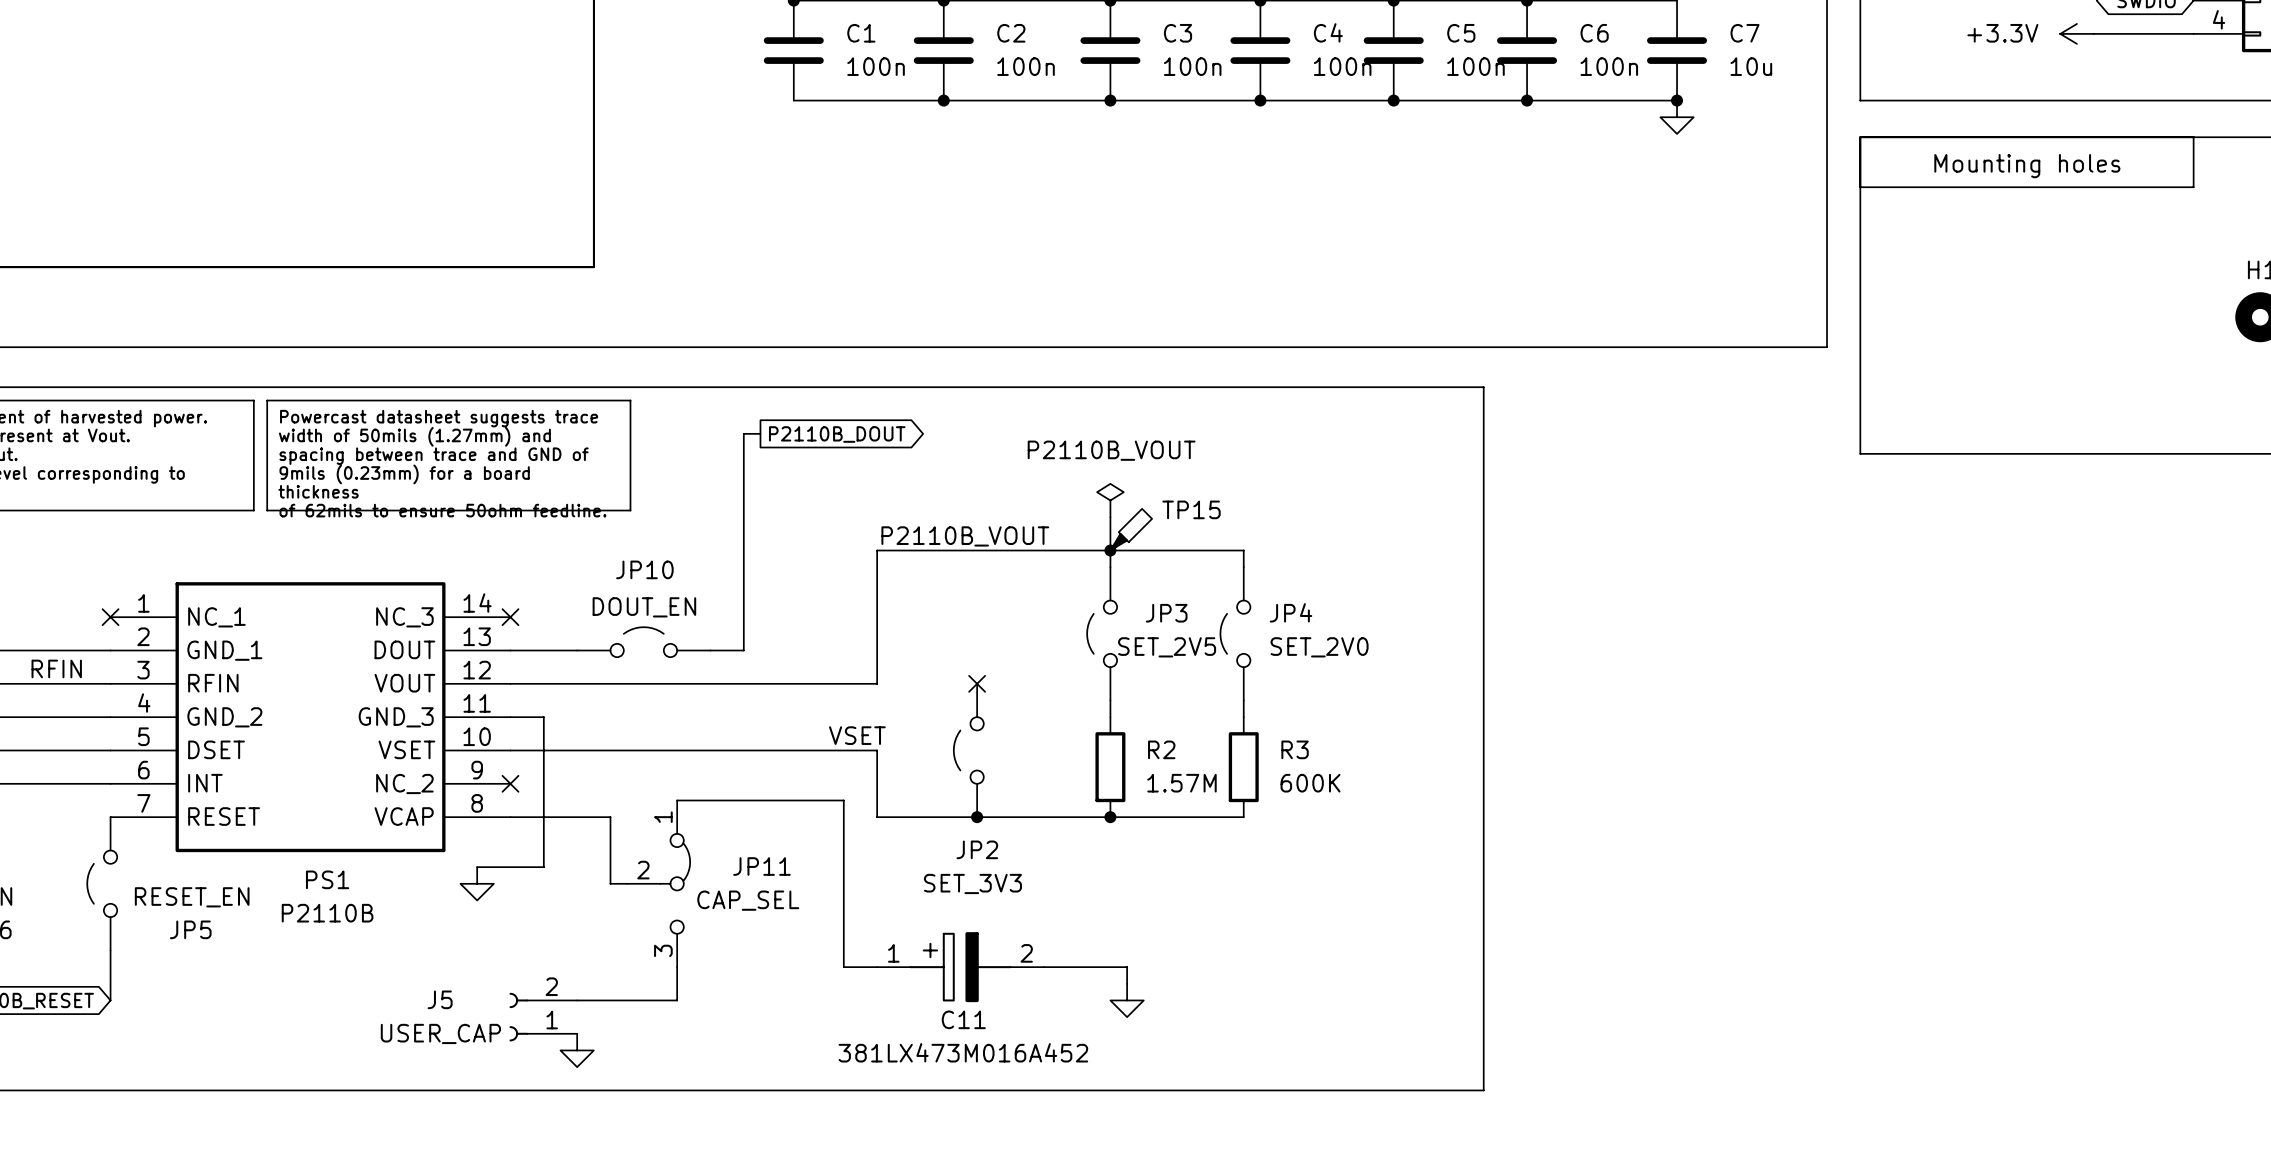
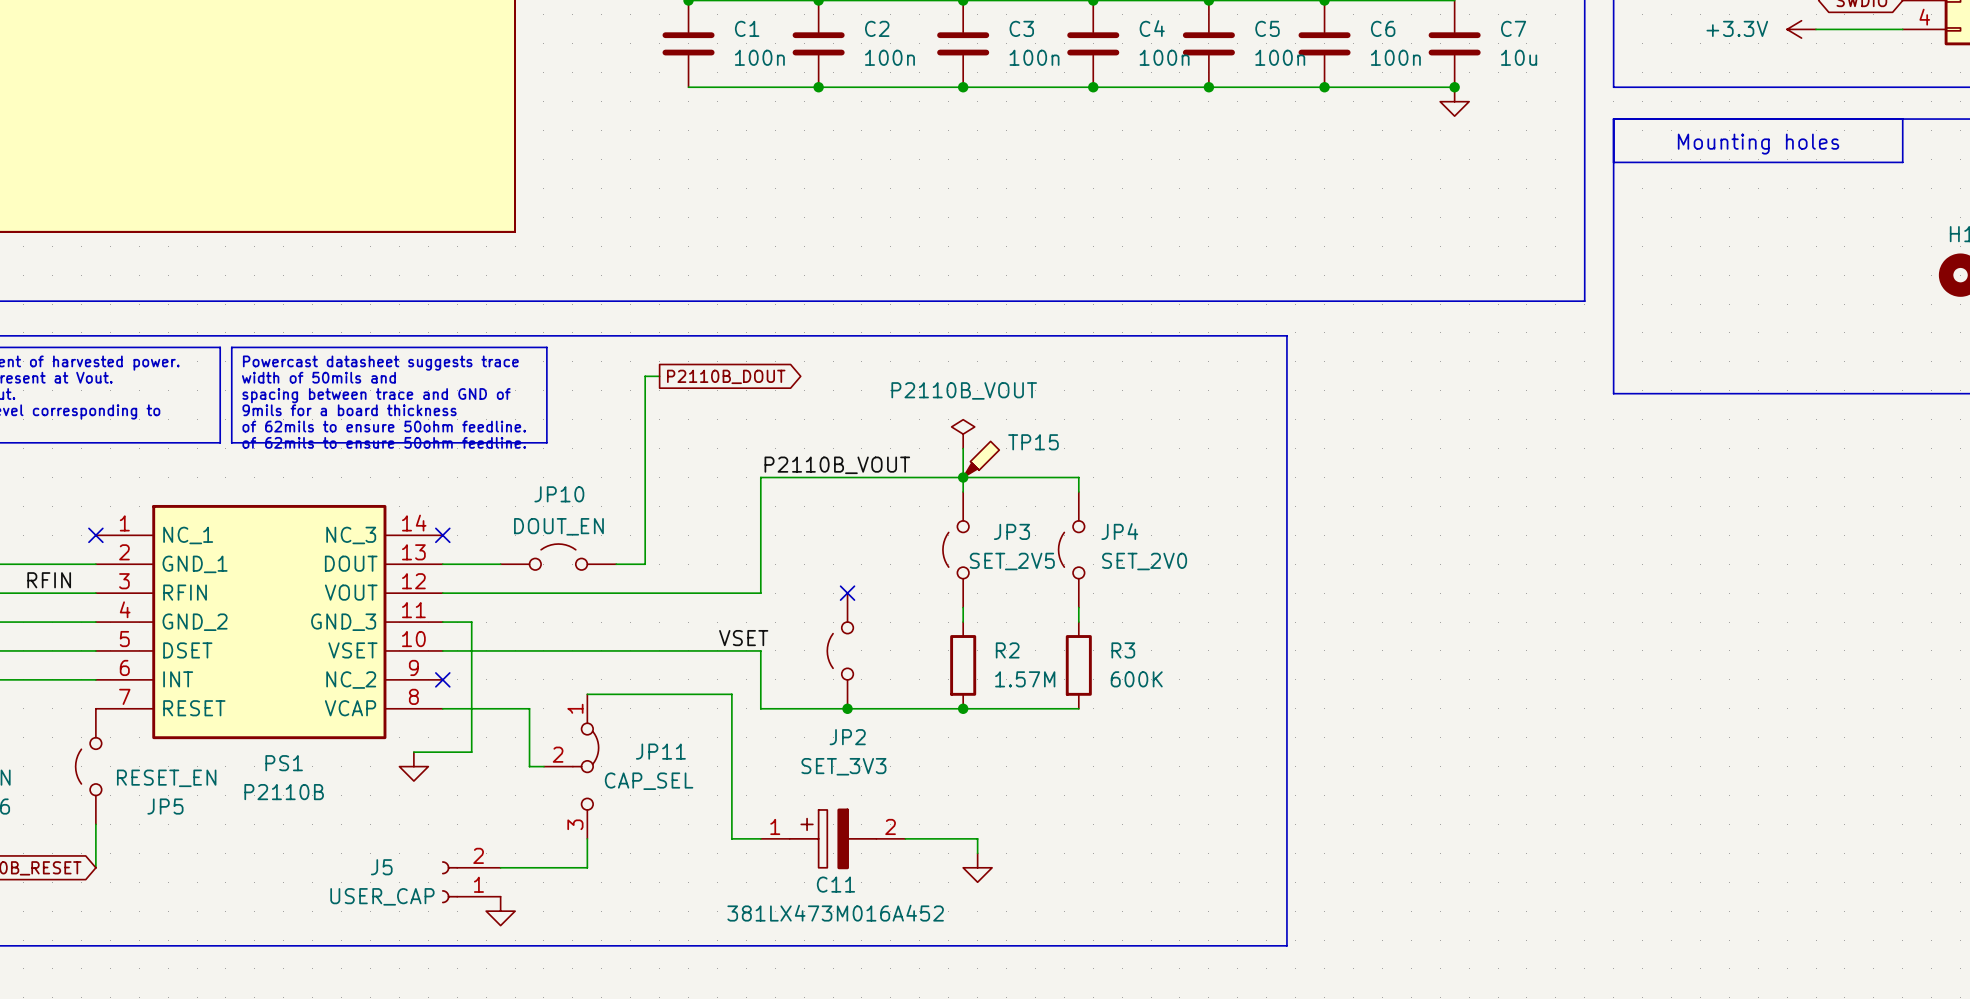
text: width of 50mils (1.27mm) and (414, 436) -> width of 50mils and (318, 377)
text: 9mils (0.23mm) for a board (404, 474) -> 9mils for a board thickness (349, 410)
text: thickness (318, 491) -> of 62mils to ensure 50ohm feedline. (384, 426)

